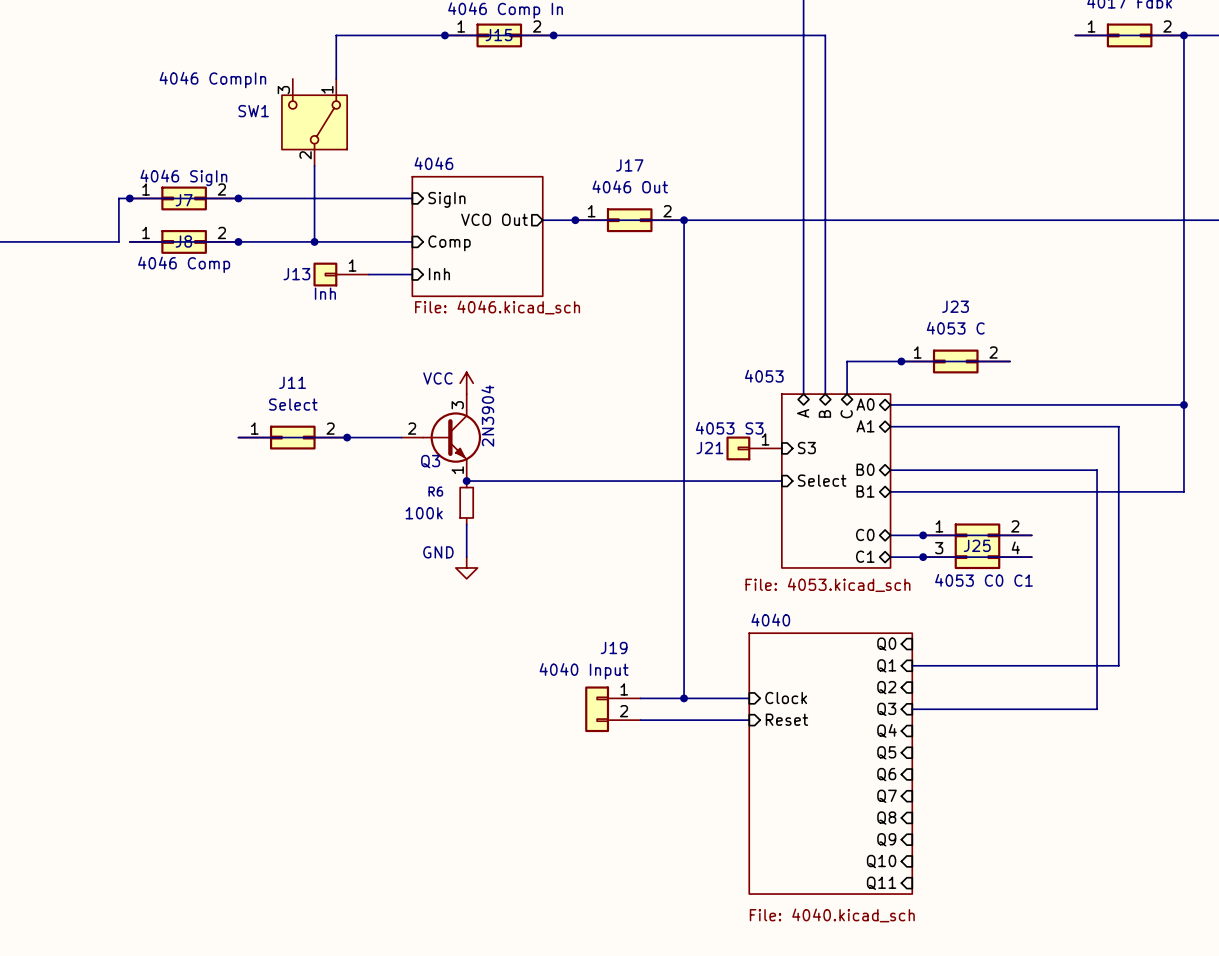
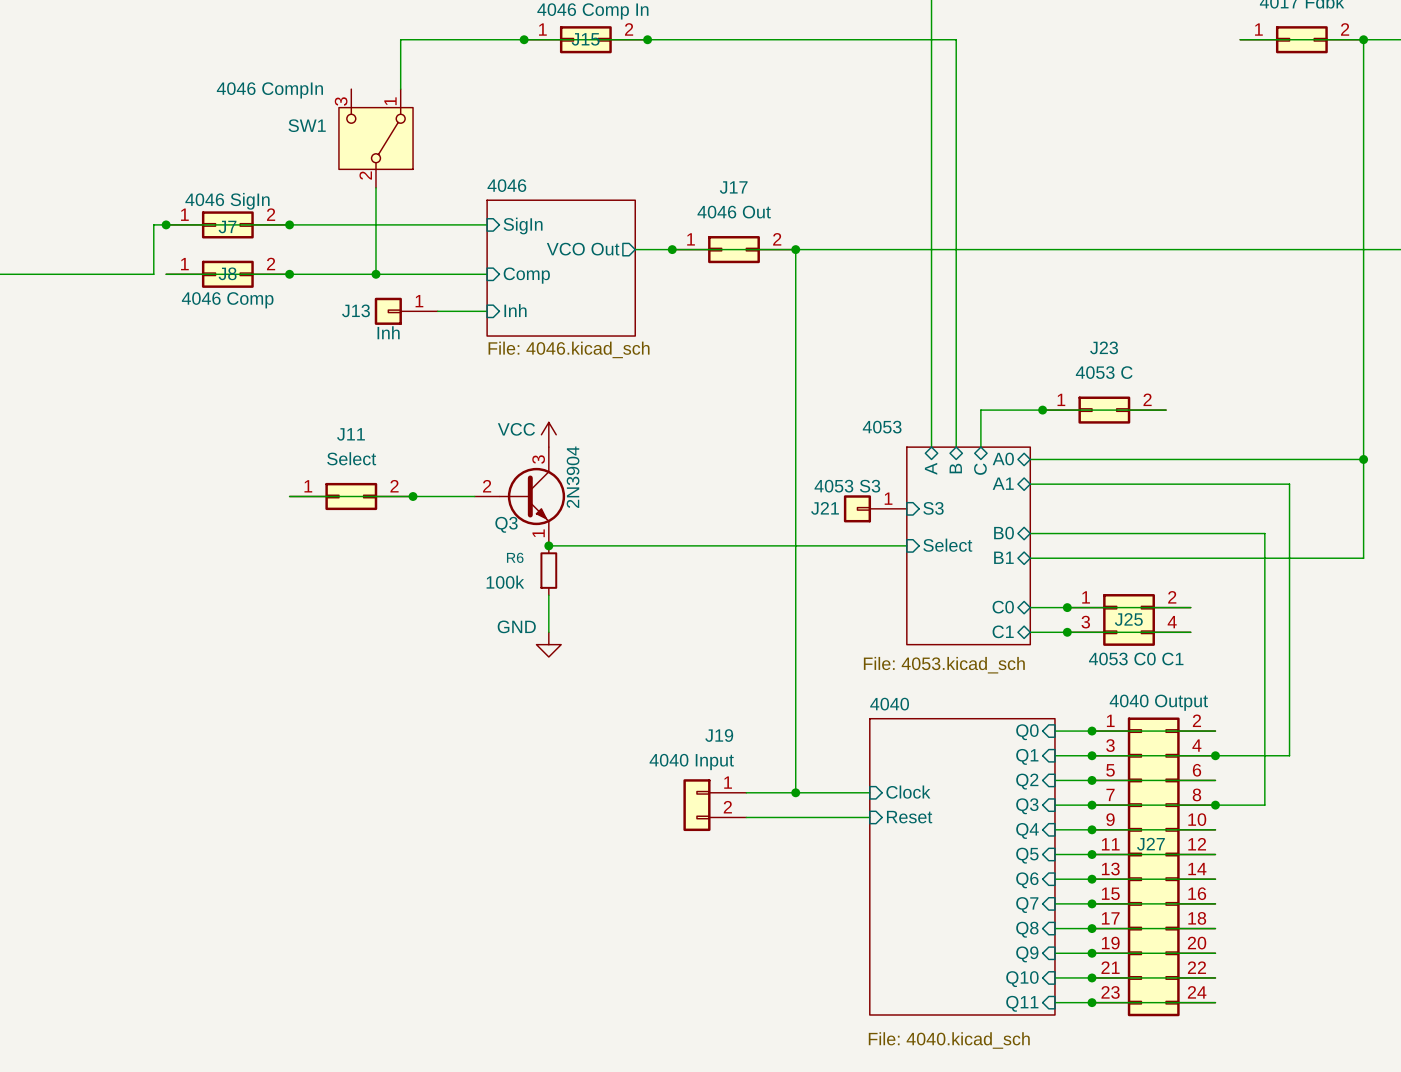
wire: none -> (1054, 731) (1215, 731)
junction: none -> (1092, 731)
junction: none -> (1092, 755)
junction: none -> (1215, 755)
wire: none -> (1054, 780) (1215, 780)
junction: none -> (1092, 780)
junction: none -> (1092, 805)
junction: none -> (1215, 805)
wire: none -> (1054, 829) (1215, 829)
junction: none -> (1092, 829)
wire: none -> (1054, 854) (1215, 854)
junction: none -> (1092, 854)
J27: none -> 4040 Output (1153, 866)
wire: none -> (1054, 879) (1215, 879)
junction: none -> (1092, 879)
wire: none -> (1054, 903) (1215, 903)
junction: none -> (1092, 903)
wire: none -> (1054, 928) (1215, 928)
junction: none -> (1092, 928)
wire: none -> (1054, 953) (1215, 953)
junction: none -> (1092, 953)
wire: none -> (1054, 977) (1215, 977)
junction: none -> (1092, 977)
wire: none -> (1054, 1002) (1215, 1002)
junction: none -> (1092, 1002)

